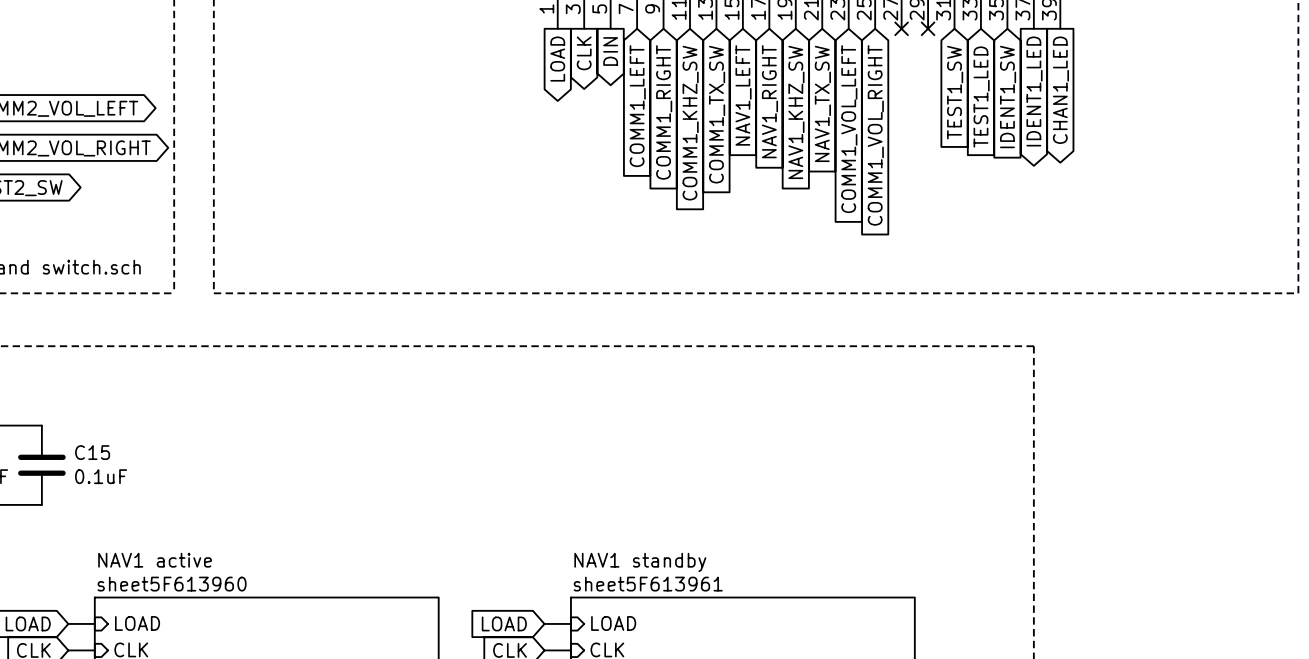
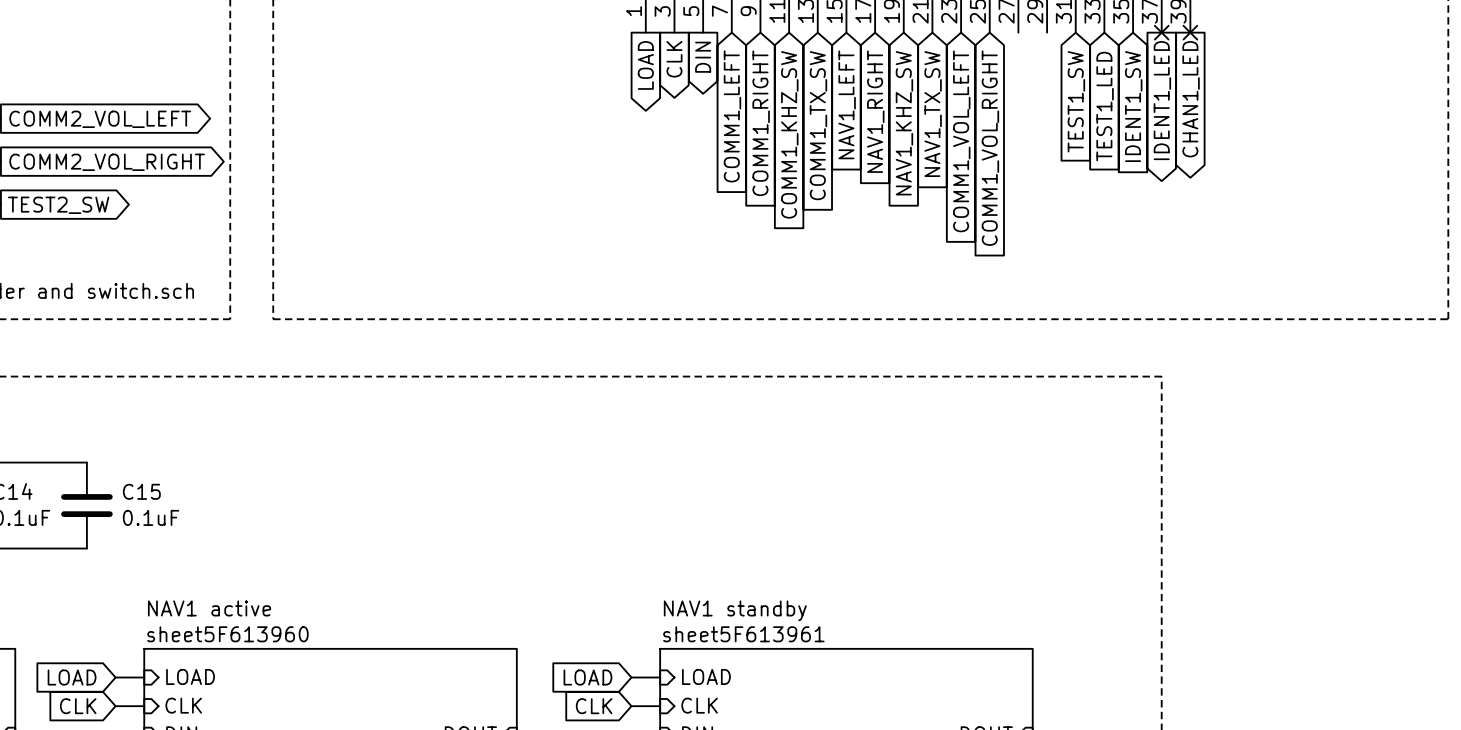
no-connect mark: (901, 28) -> none
no-connect mark: (928, 28) -> none
no-connect mark: none -> (1161, 32)
no-connect mark: none -> (1190, 32)

